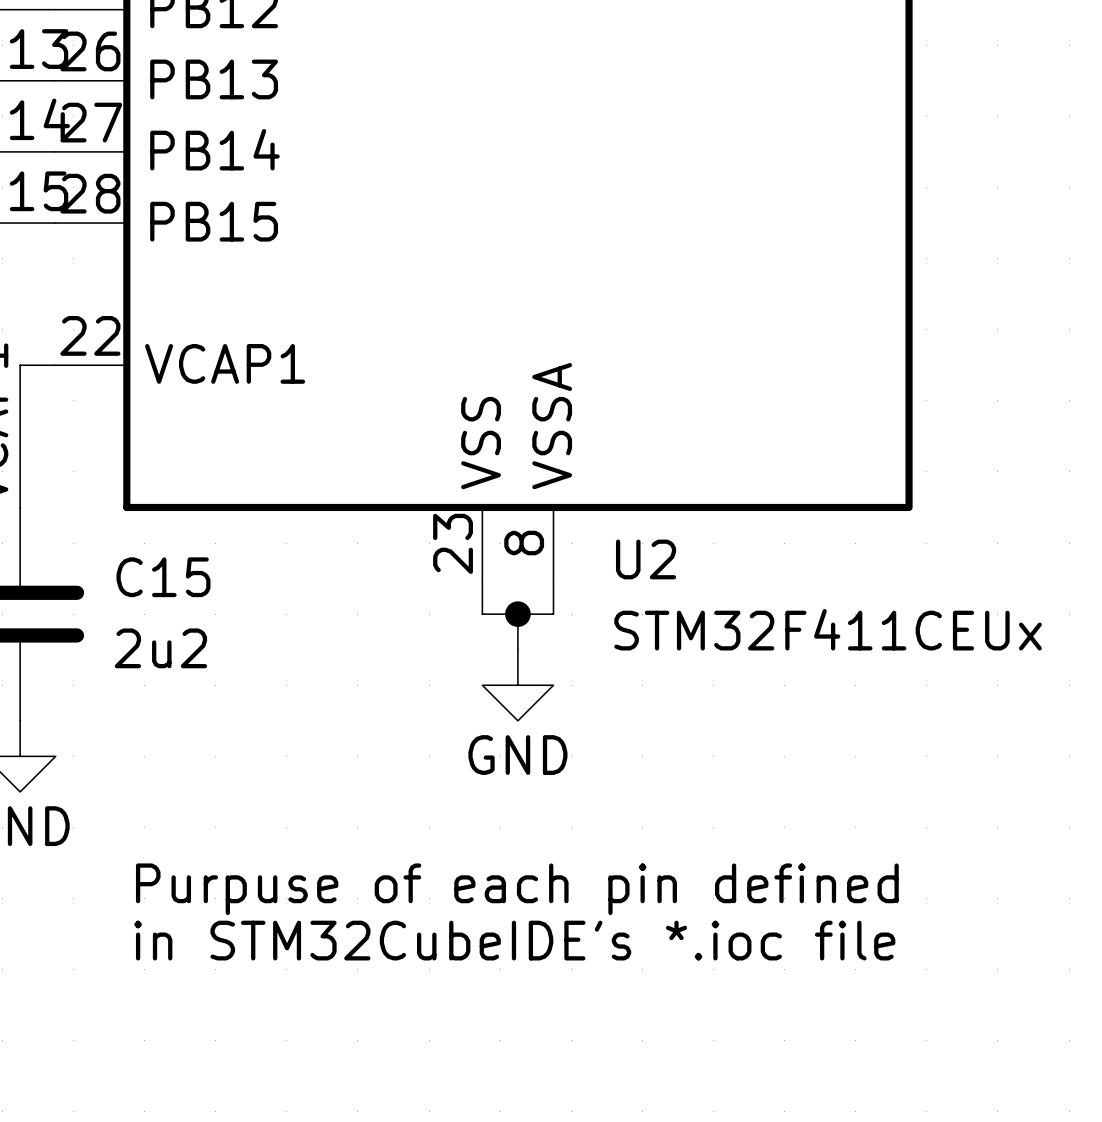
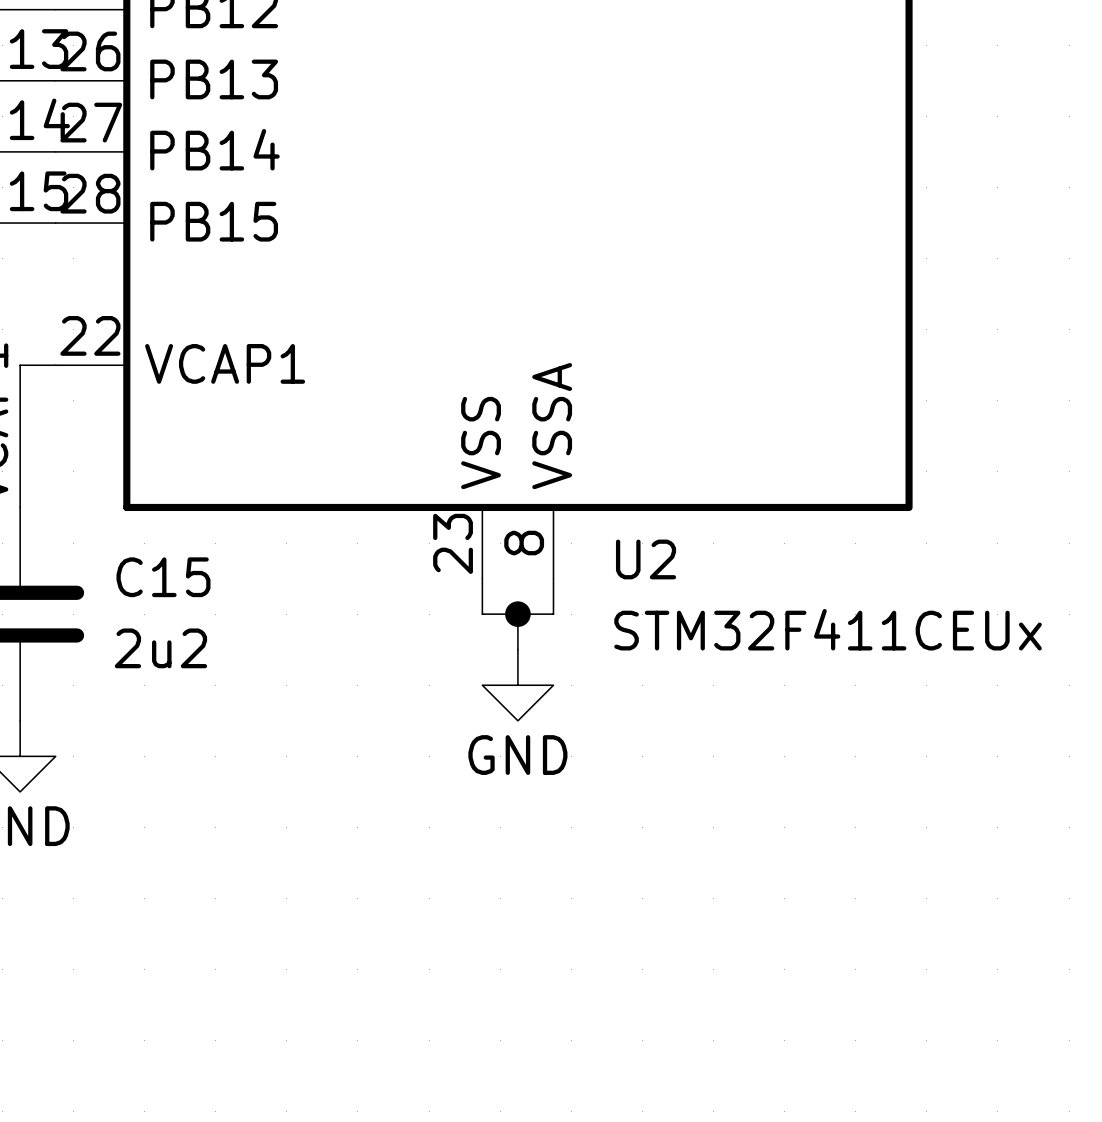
text: Purpuse of each pin defined (517, 889) -> none
text: in STM32CubeIDE's *.ioc file (514, 940) -> none

